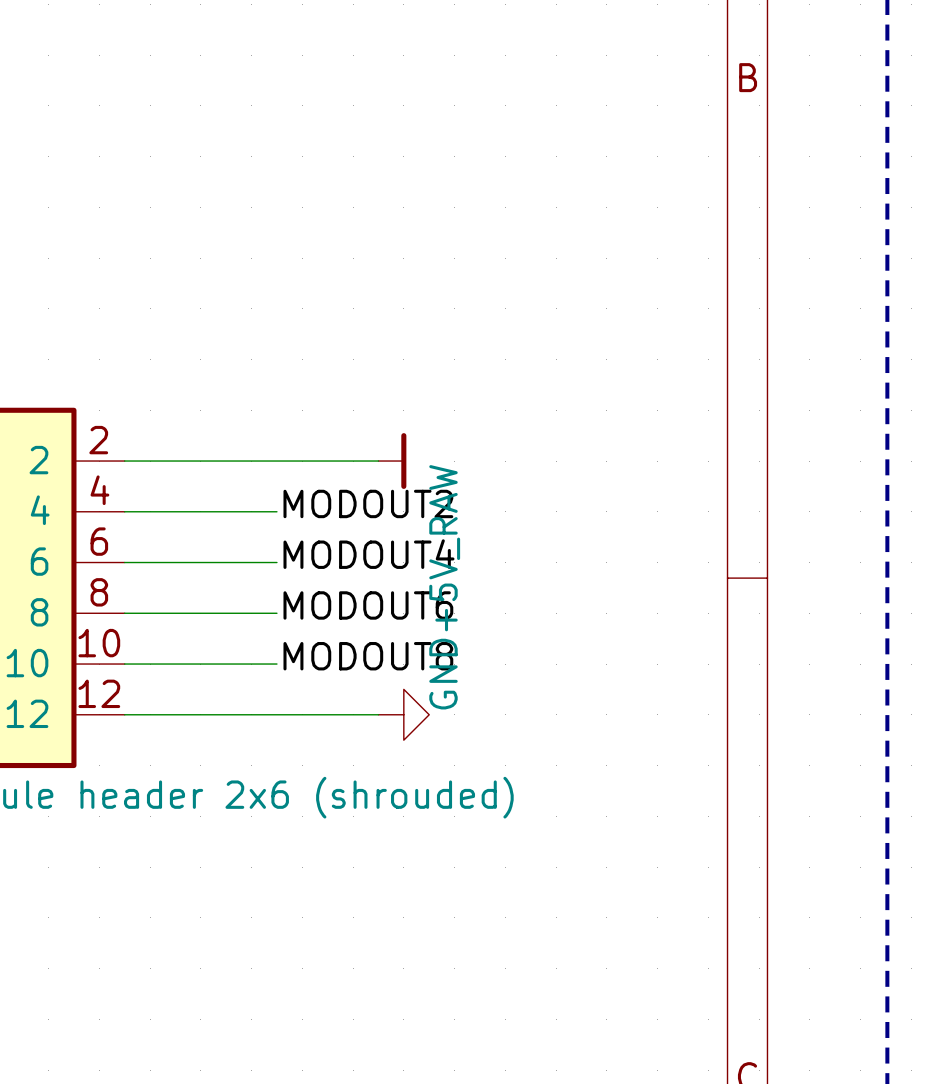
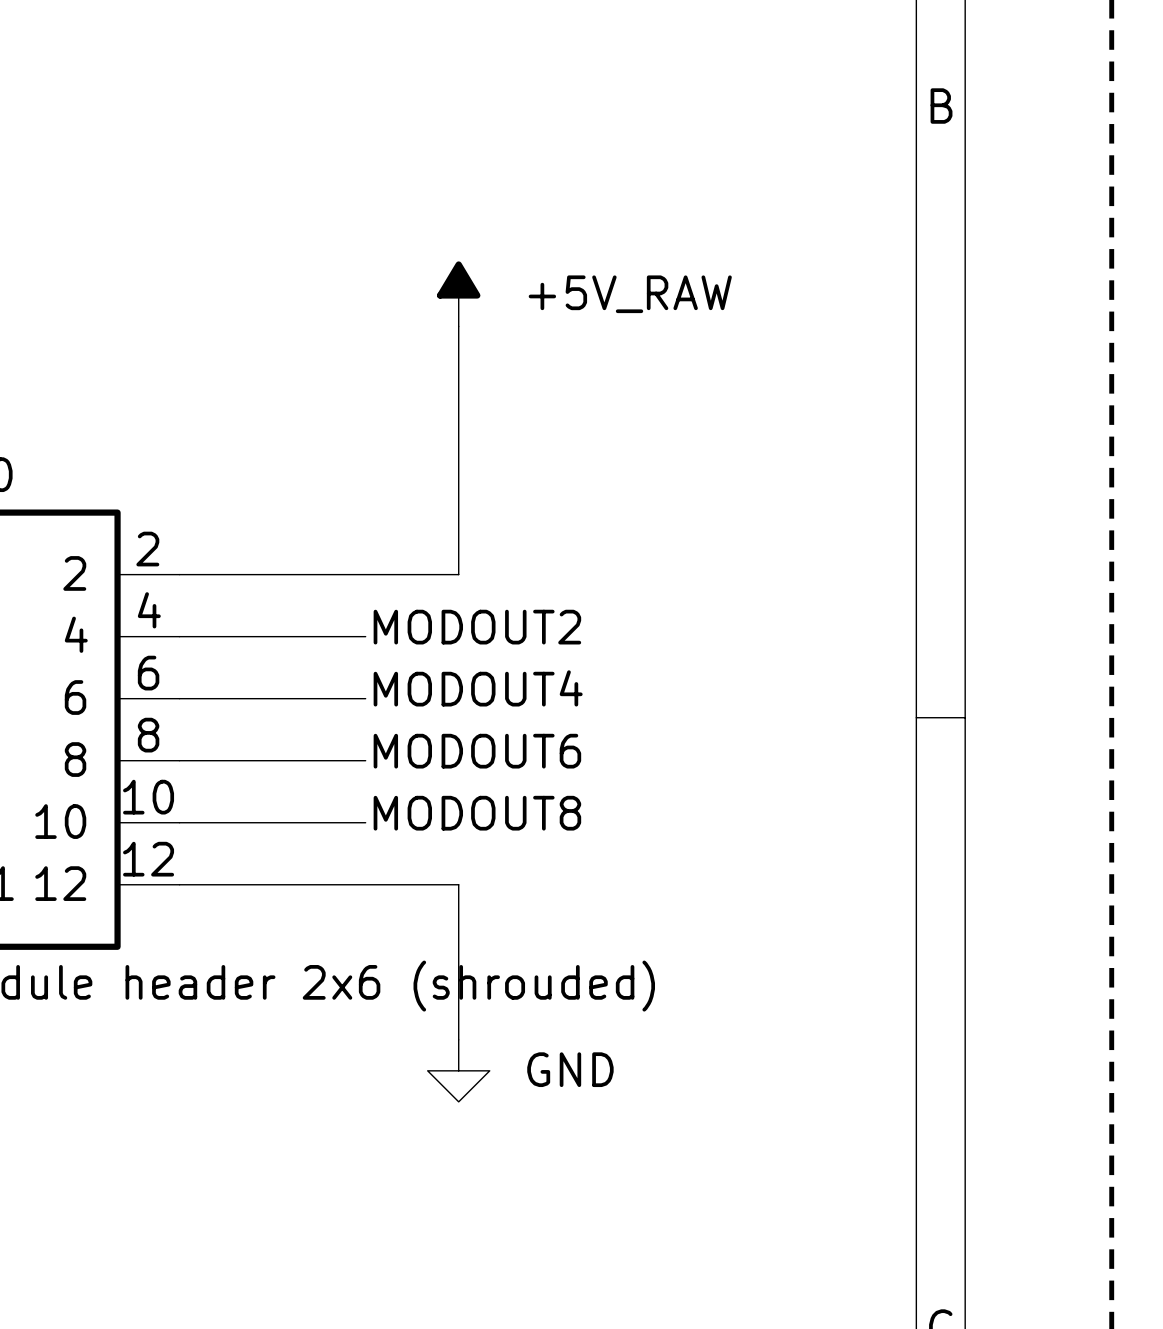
power symbol: none -> +5V_RAW (458, 293)
wire: (353, 461) (378, 461) -> (458, 574) (458, 326)
power symbol: +5V_RAW (392, 461) -> none
power symbol text position: GND (443, 674) -> GND (570, 1069)
wire: (353, 714) (378, 714) -> (458, 884) (458, 1039)
power symbol rotation: 0° (403, 714) -> 90° clockwise (458, 1070)
power symbol position: GND (403, 714) -> GND (458, 1070)

